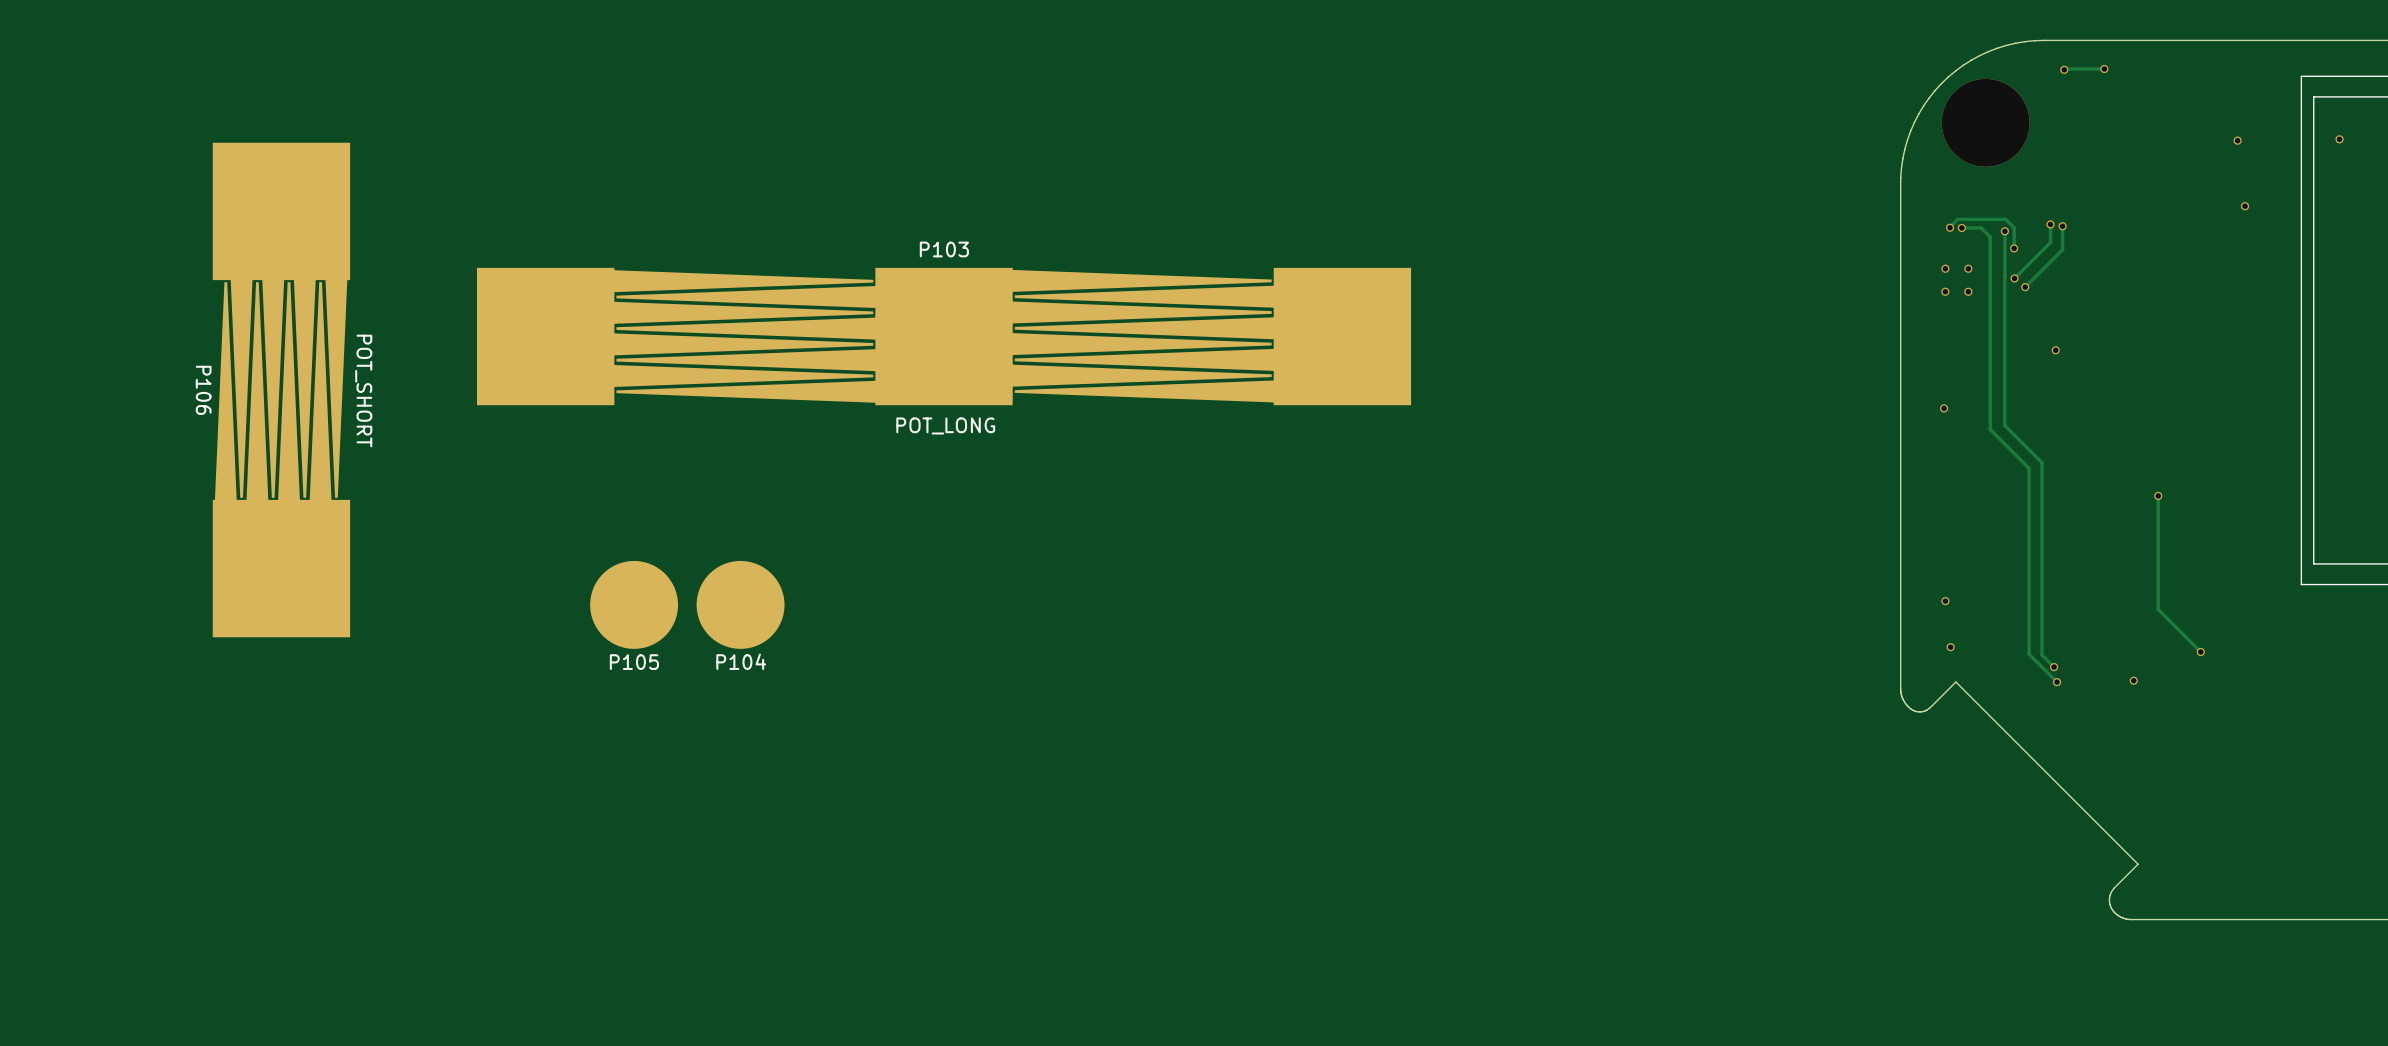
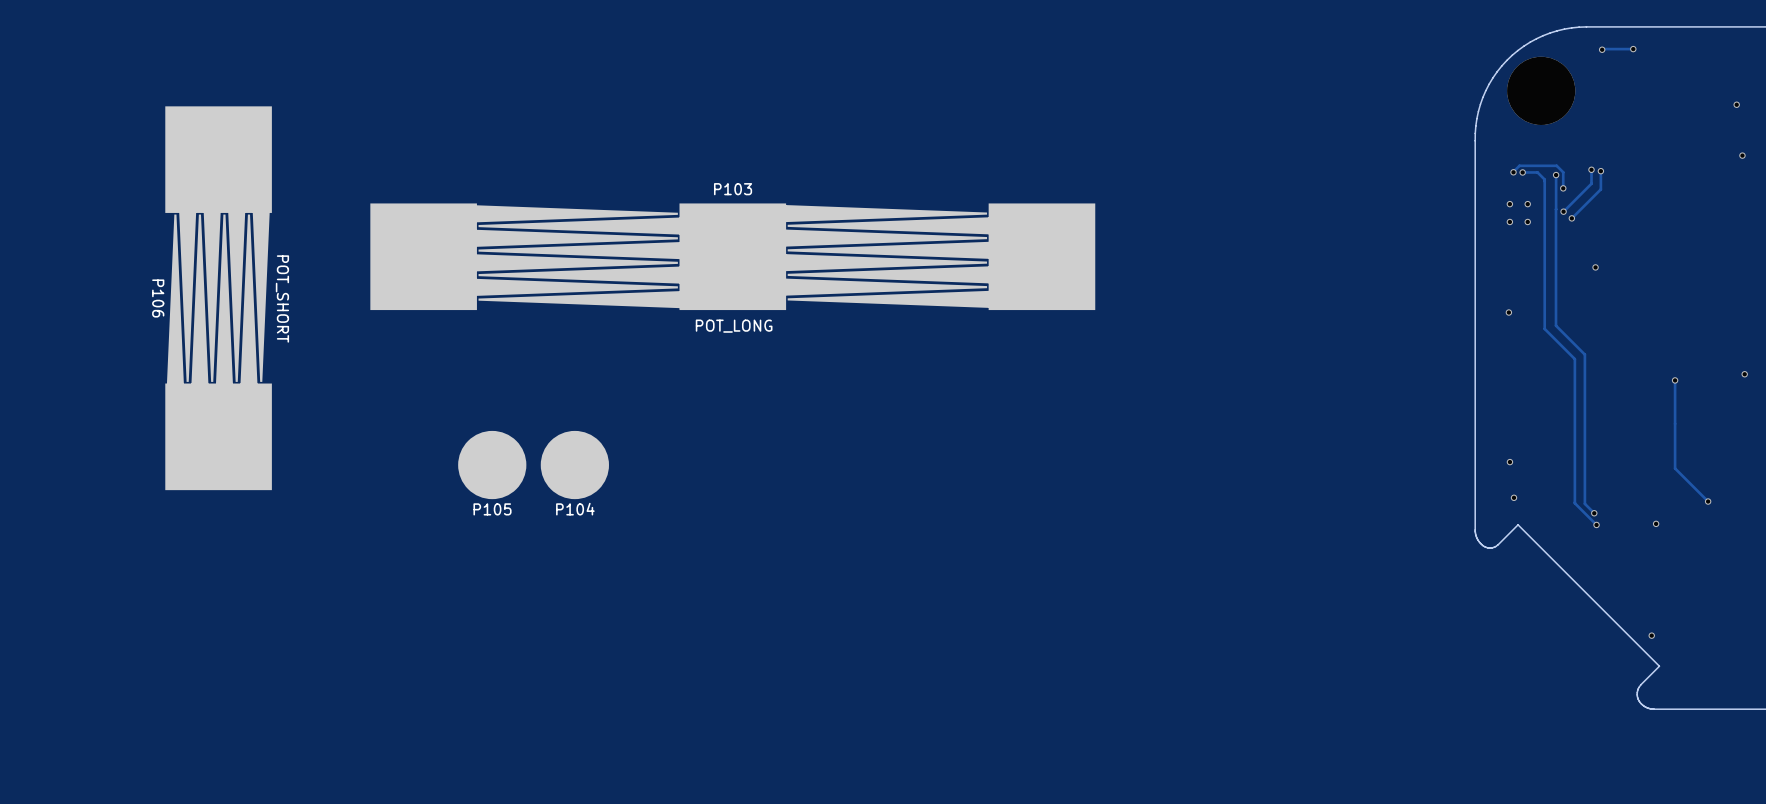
via: none -> (1744, 374)
via: none -> (1651, 635)

